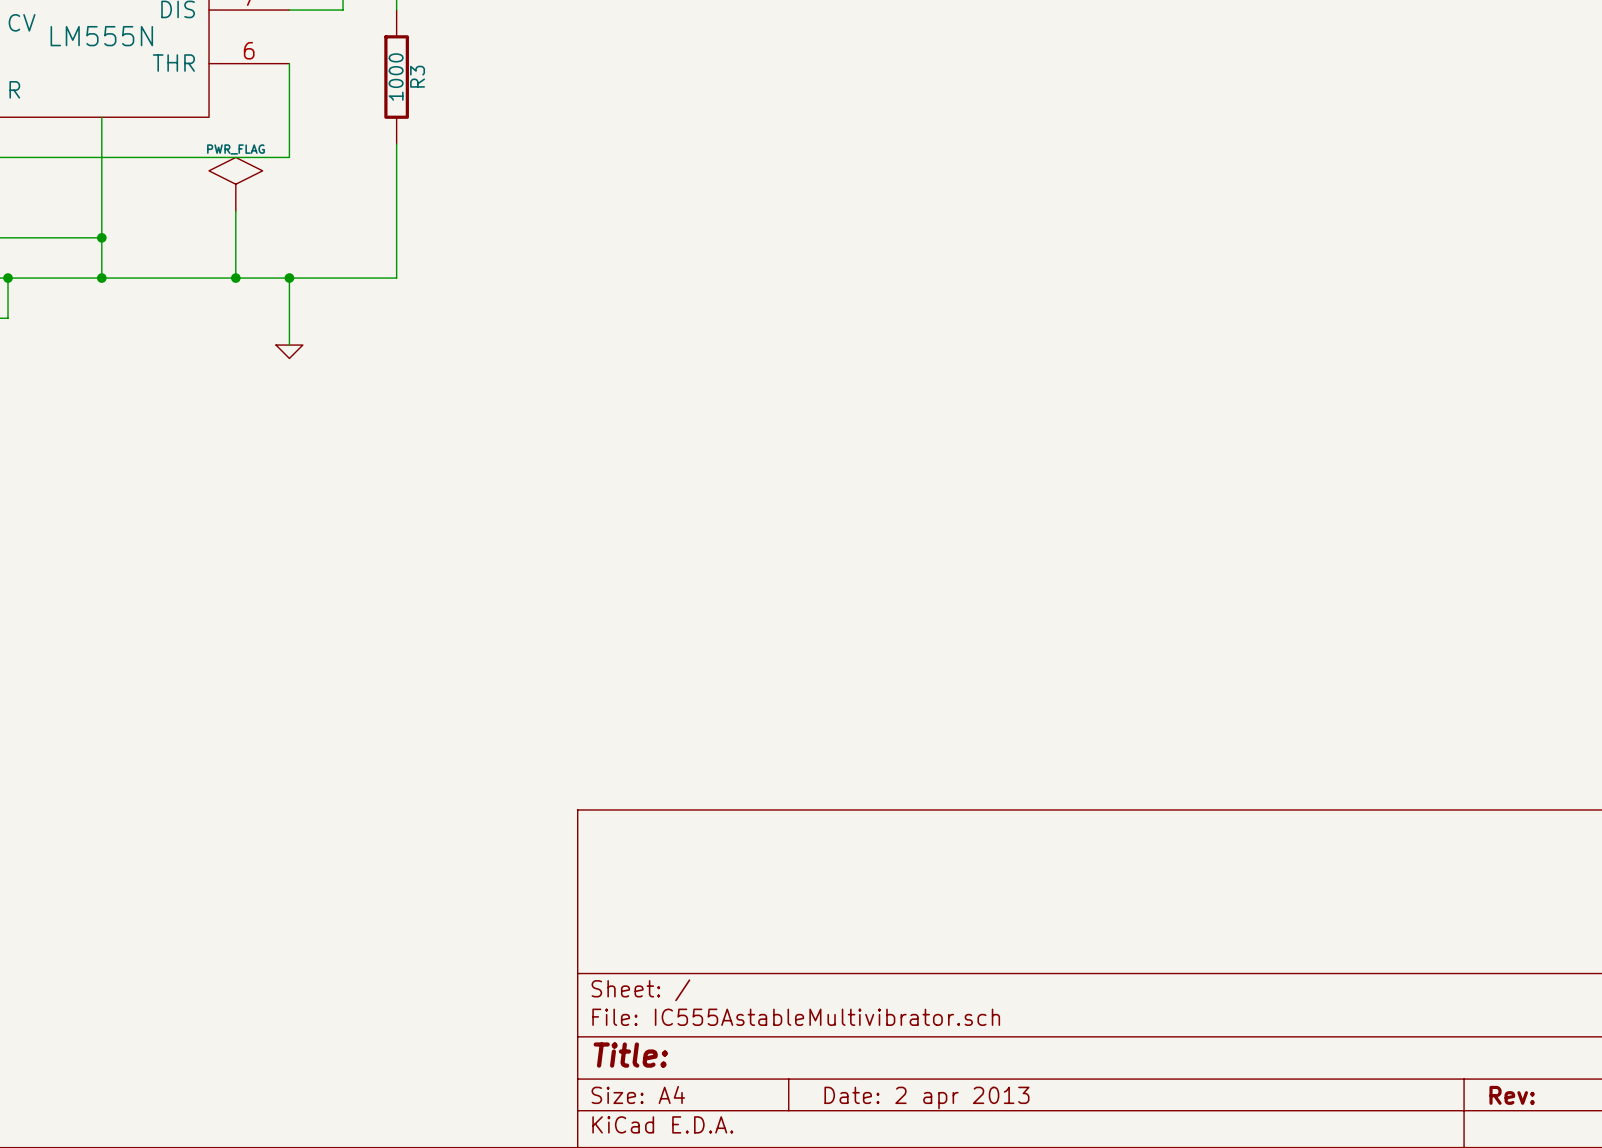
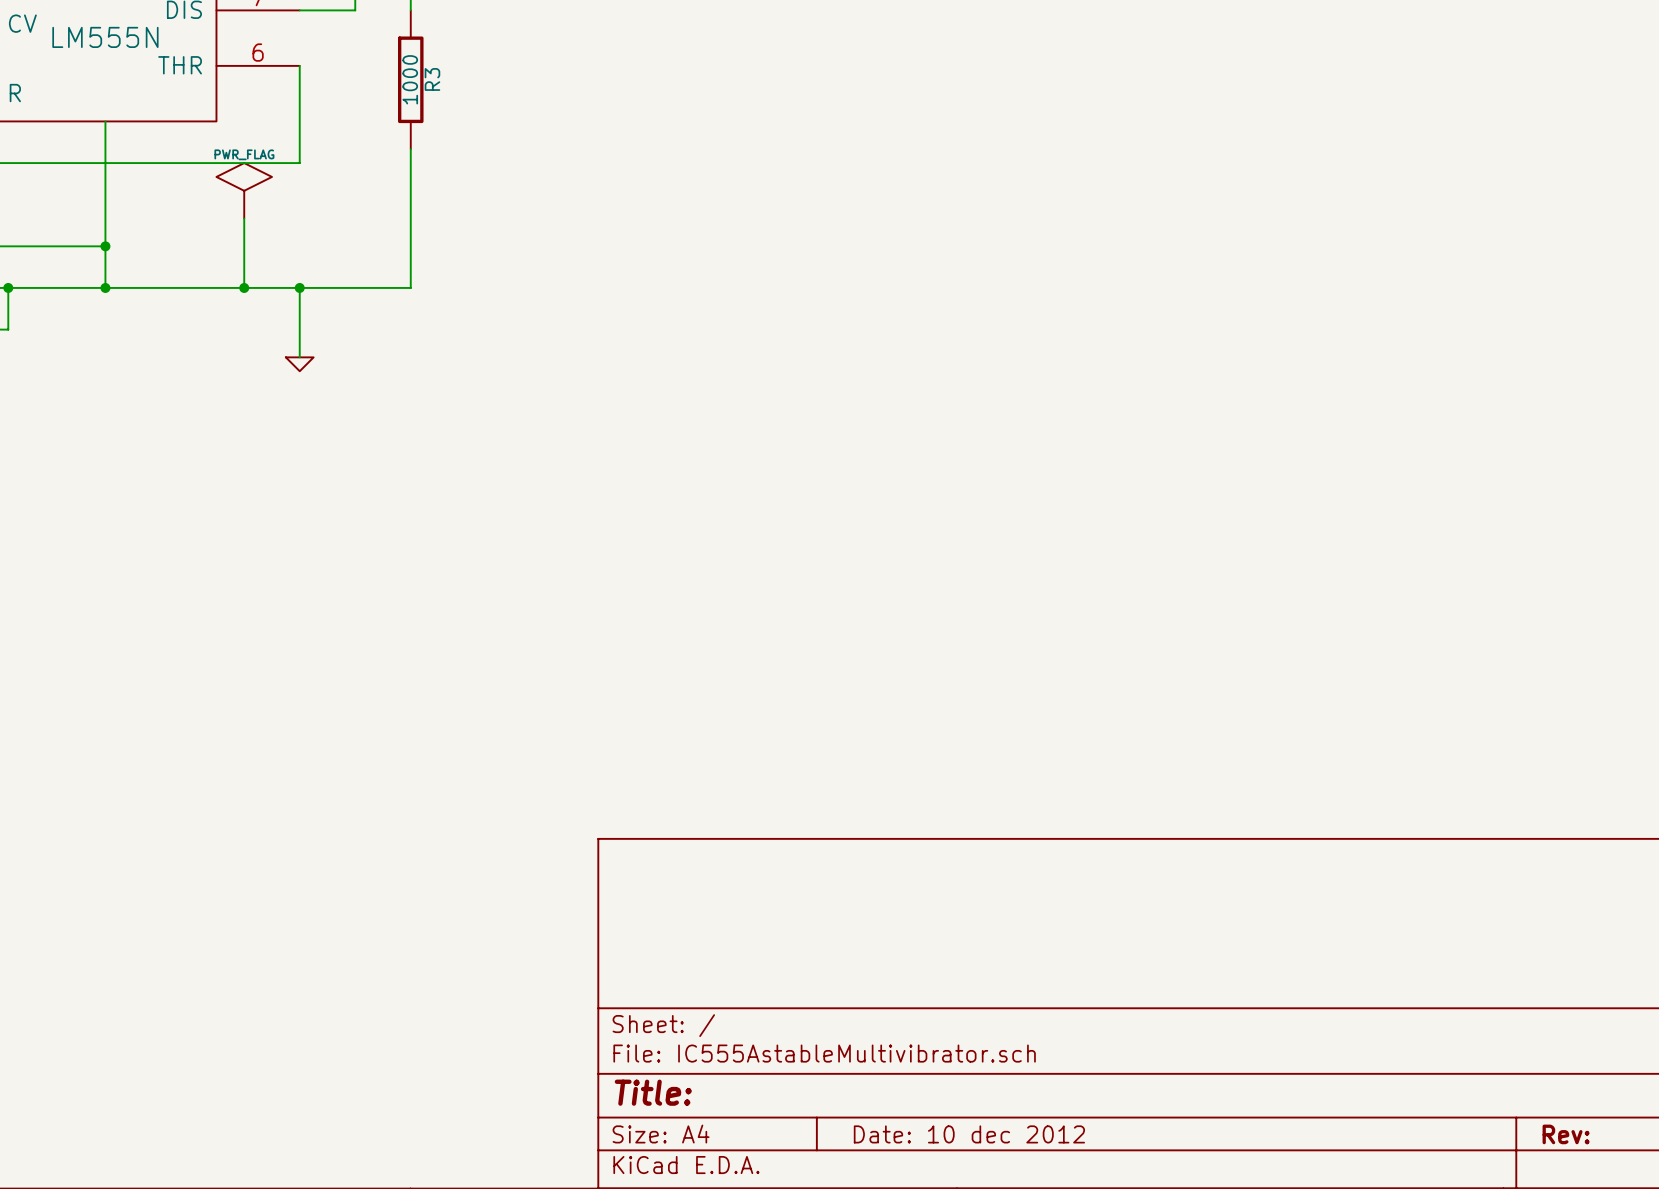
title block: Date: 2 apr 2013 (926, 1097) -> Date: 10 dec 2012 (969, 1134)

